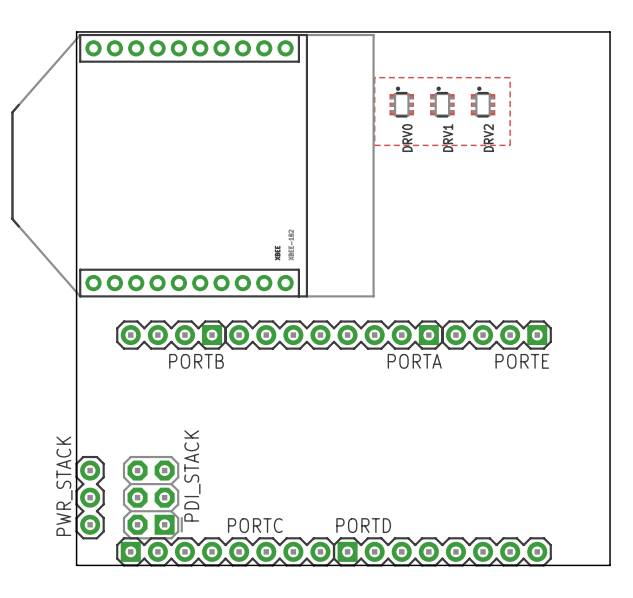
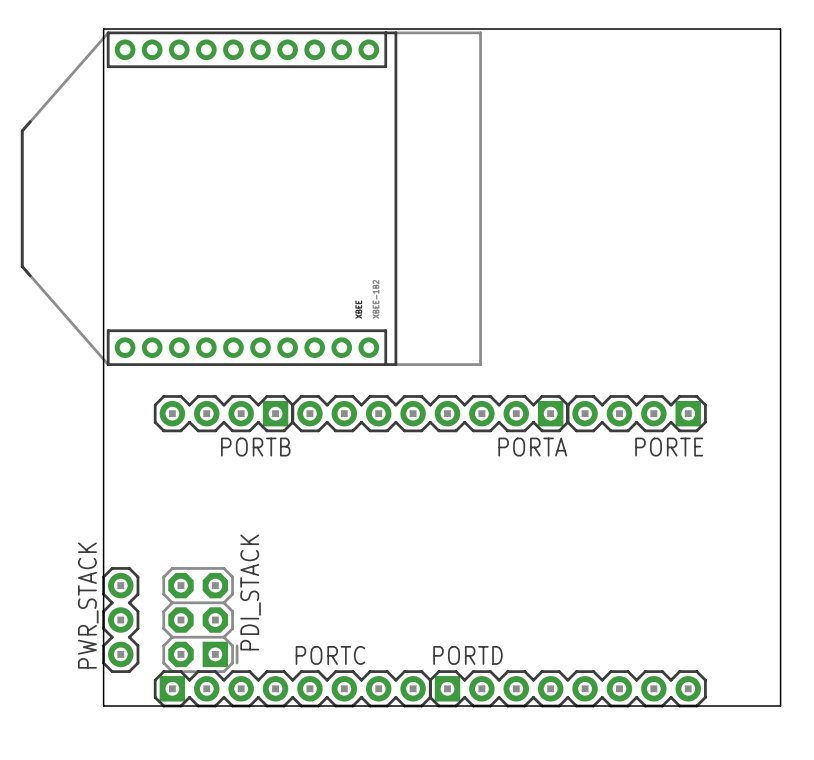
top zone outline: (374, 77) (374, 145) (510, 145) (510, 77) (374, 77) -> none
DRV0: (401, 102) -> none
DRV1: (442, 102) -> none
DRV2: (483, 102) -> none

